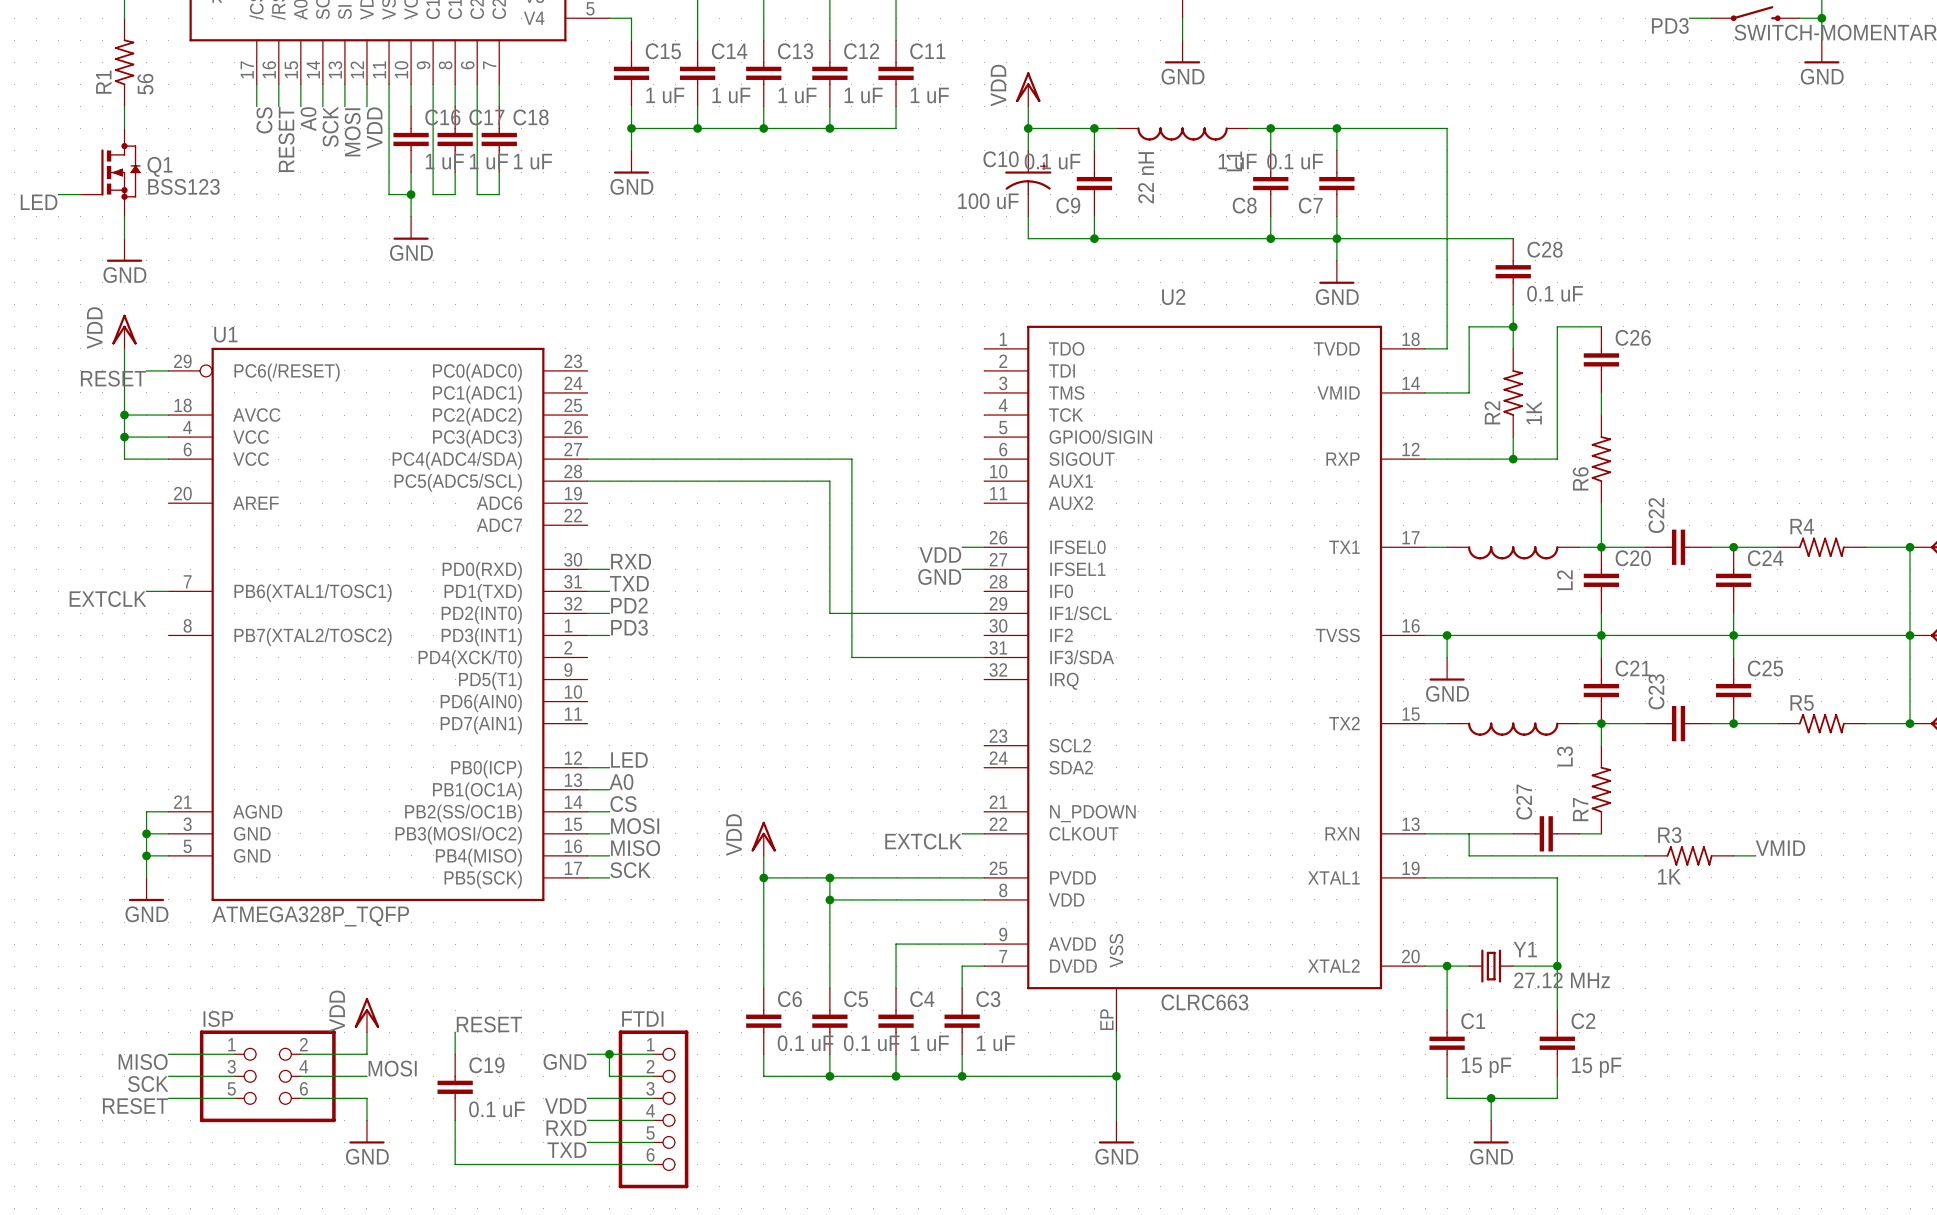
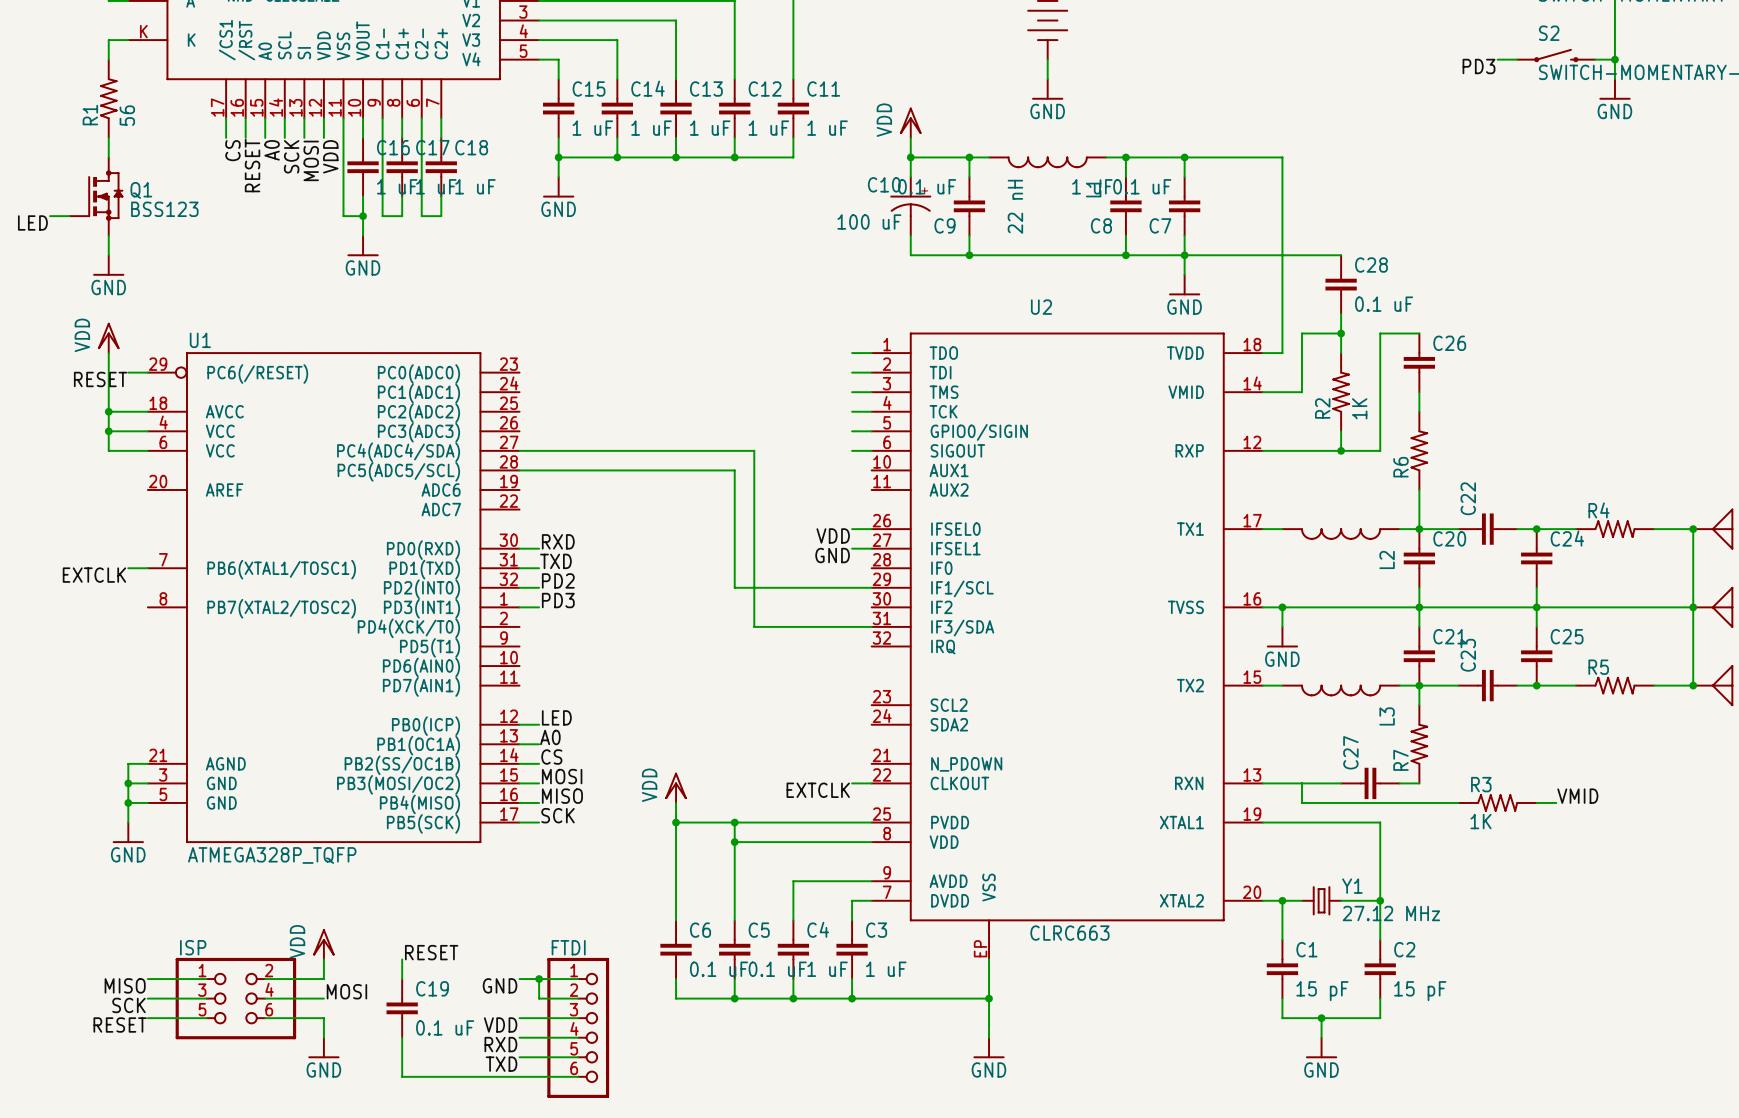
wire: none -> (852, 353) (871, 353)
wire: none -> (852, 372) (871, 372)
wire: none -> (852, 392) (871, 392)
wire: none -> (852, 411) (871, 411)
wire: none -> (852, 431) (871, 431)
wire: none -> (852, 450) (871, 450)

